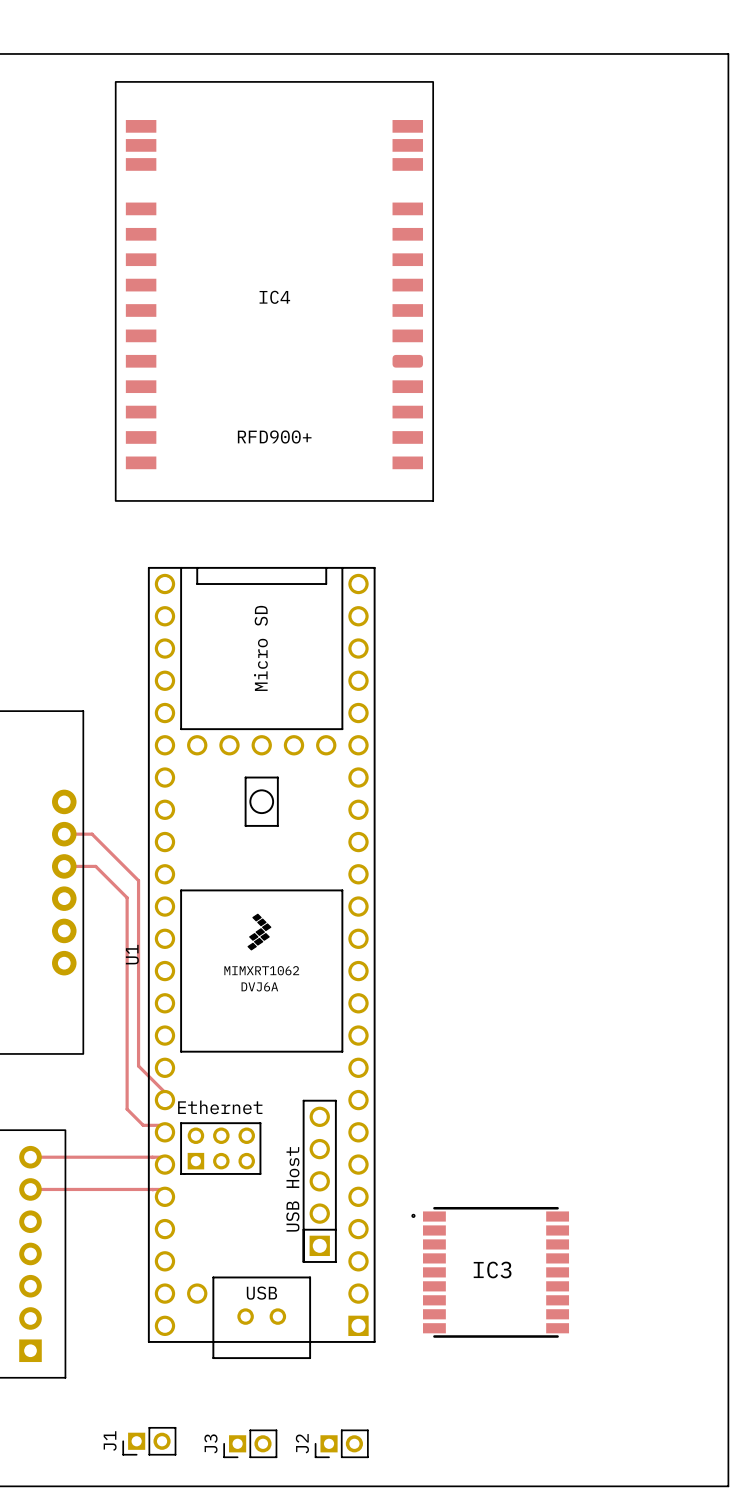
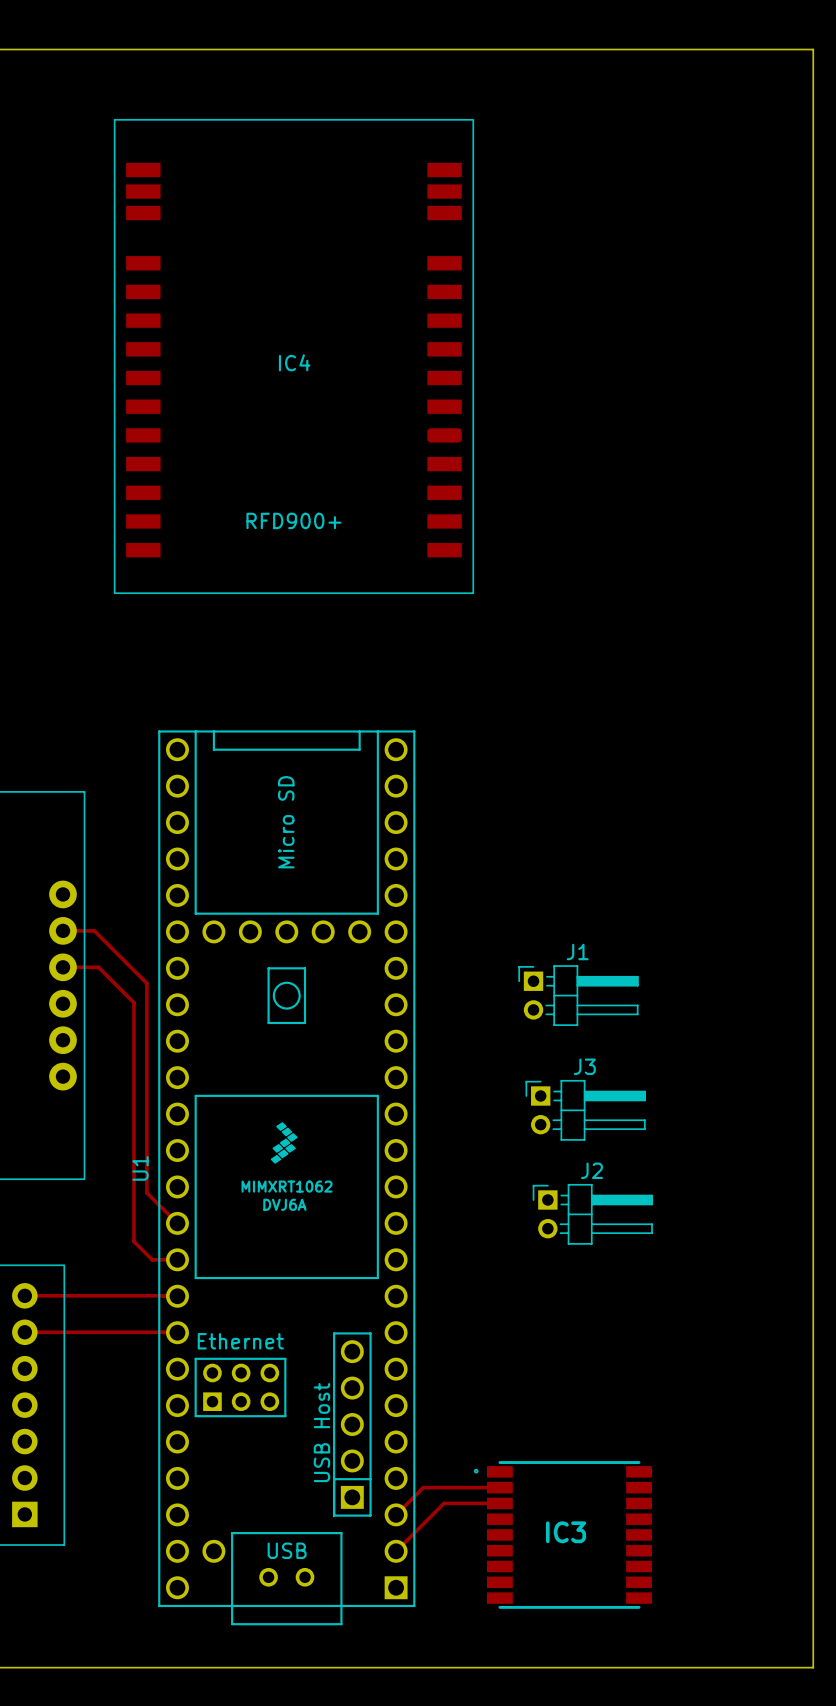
IC4 position: (274, 291) -> (293, 356)
U1 position: (261, 962) -> (286, 1177)
IC3 position: (490, 1272) -> (562, 1534)
top track: none -> (499, 1487) (423, 1487) (396, 1514)
top track: none -> (499, 1503) (444, 1503) (396, 1551)
J1 footprint: [122, 1427, 177, 1456] -> [518, 965, 639, 1026]
J3 footprint: [223, 1429, 278, 1459] -> [525, 1079, 646, 1141]
J2 footprint: [314, 1429, 369, 1459] -> [532, 1183, 653, 1245]
J1 name position: J1 (110, 1441) -> J1 (577, 952)
J3 name position: J3 (210, 1443) -> J3 (584, 1066)
J2 name position: J2 (302, 1443) -> J2 (591, 1170)

